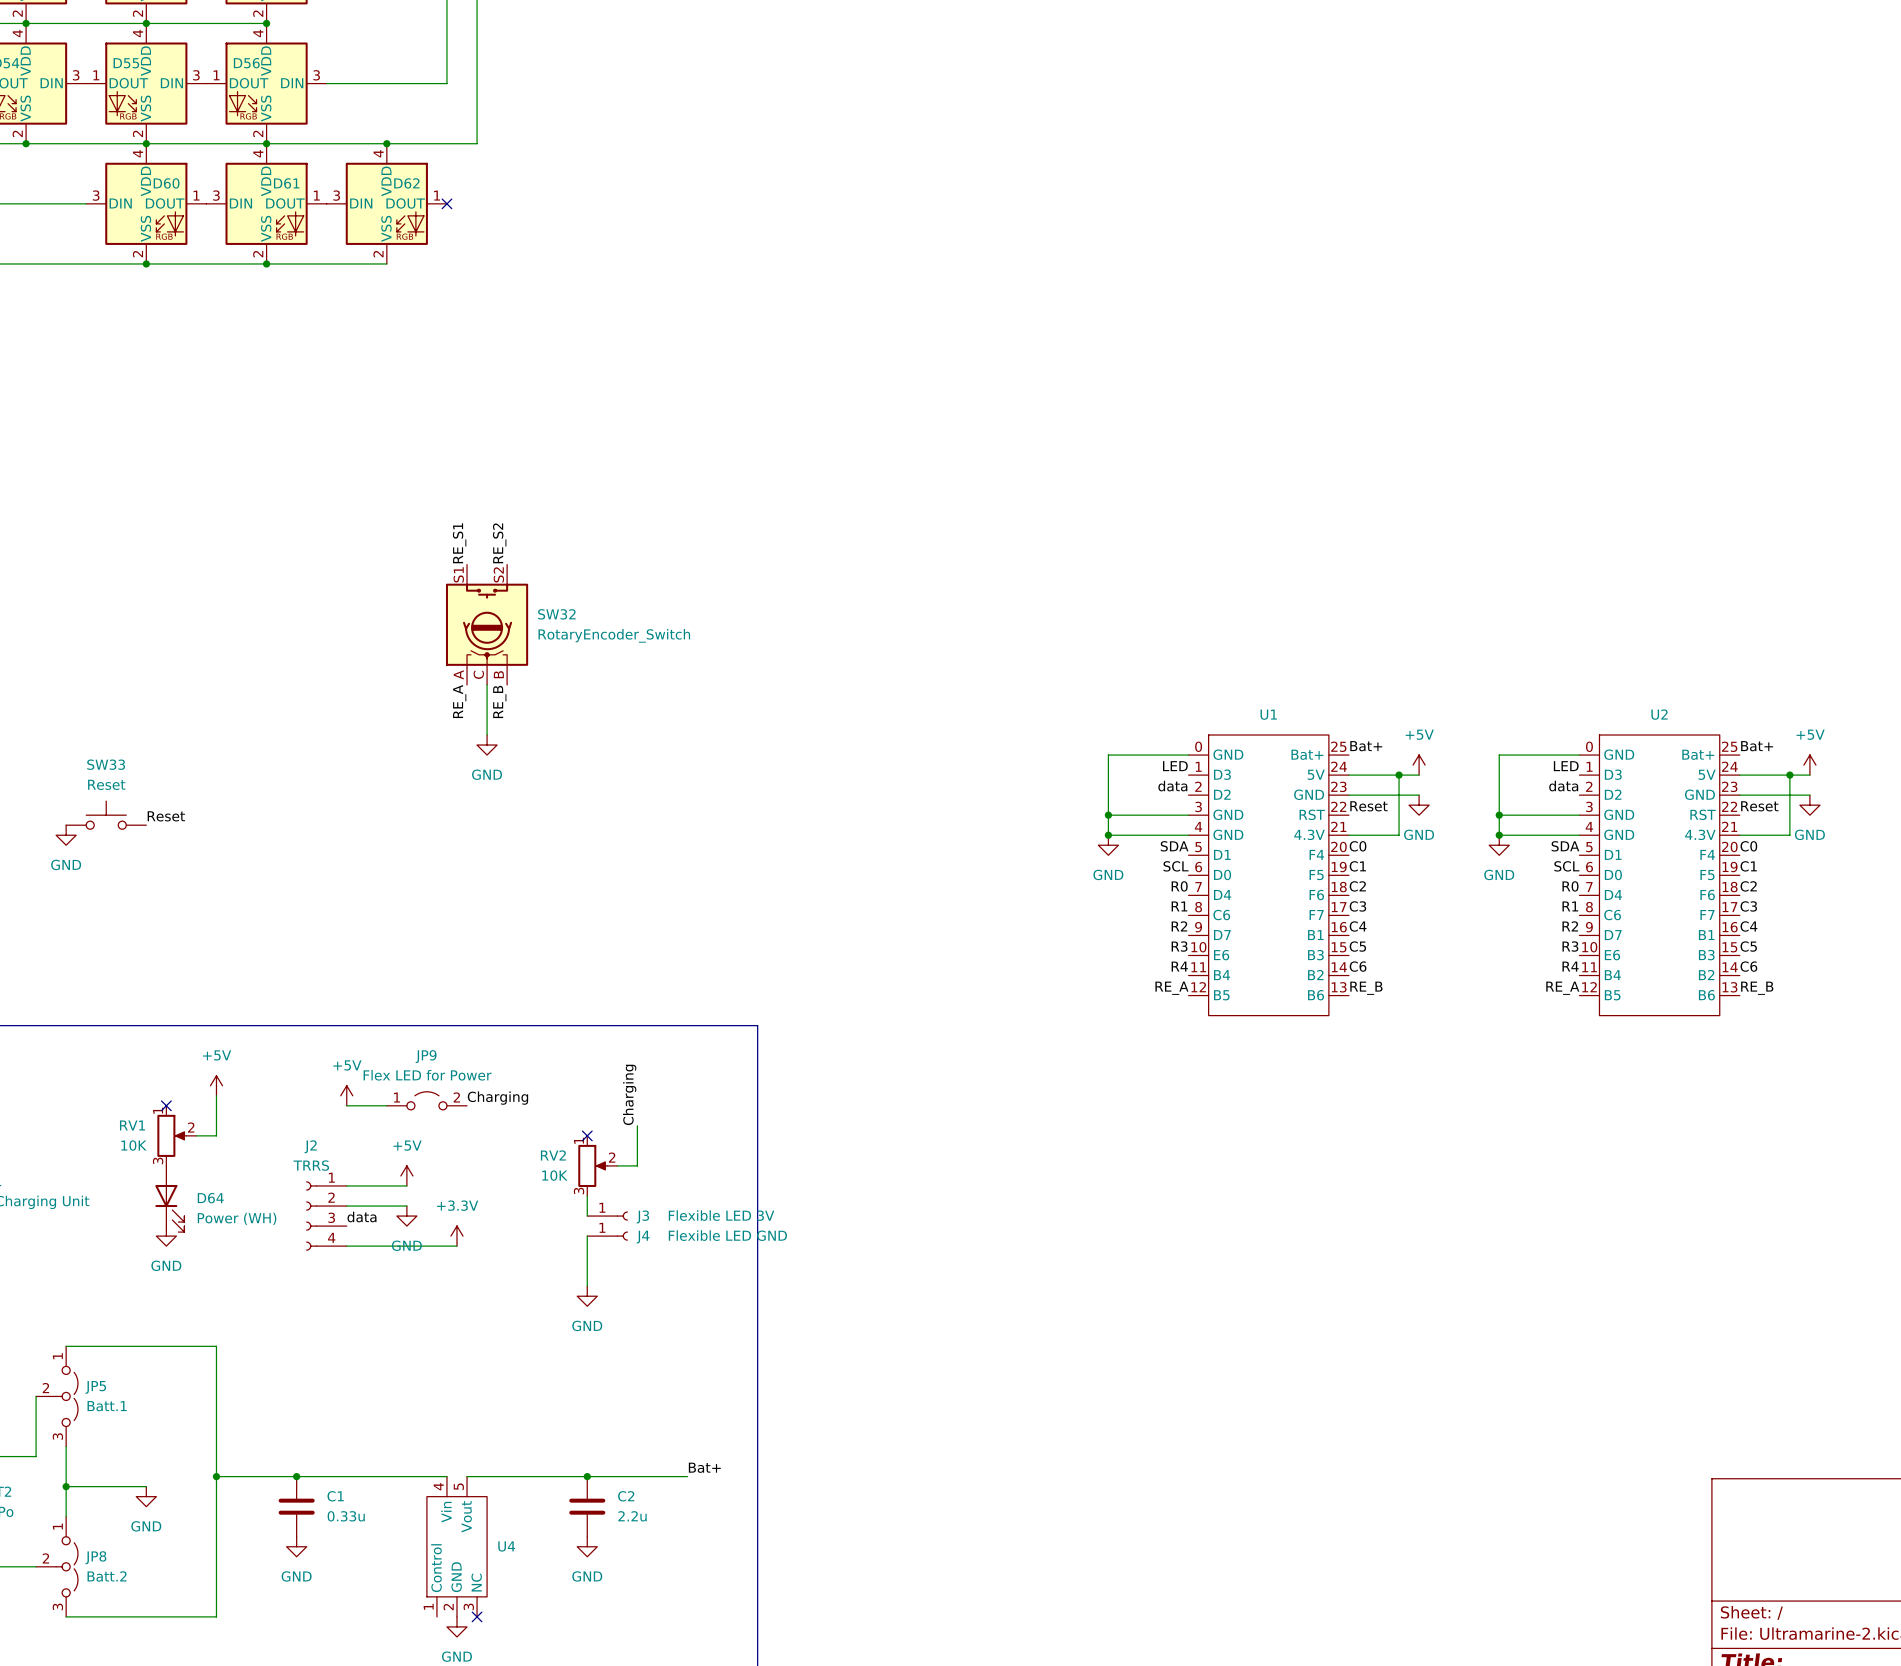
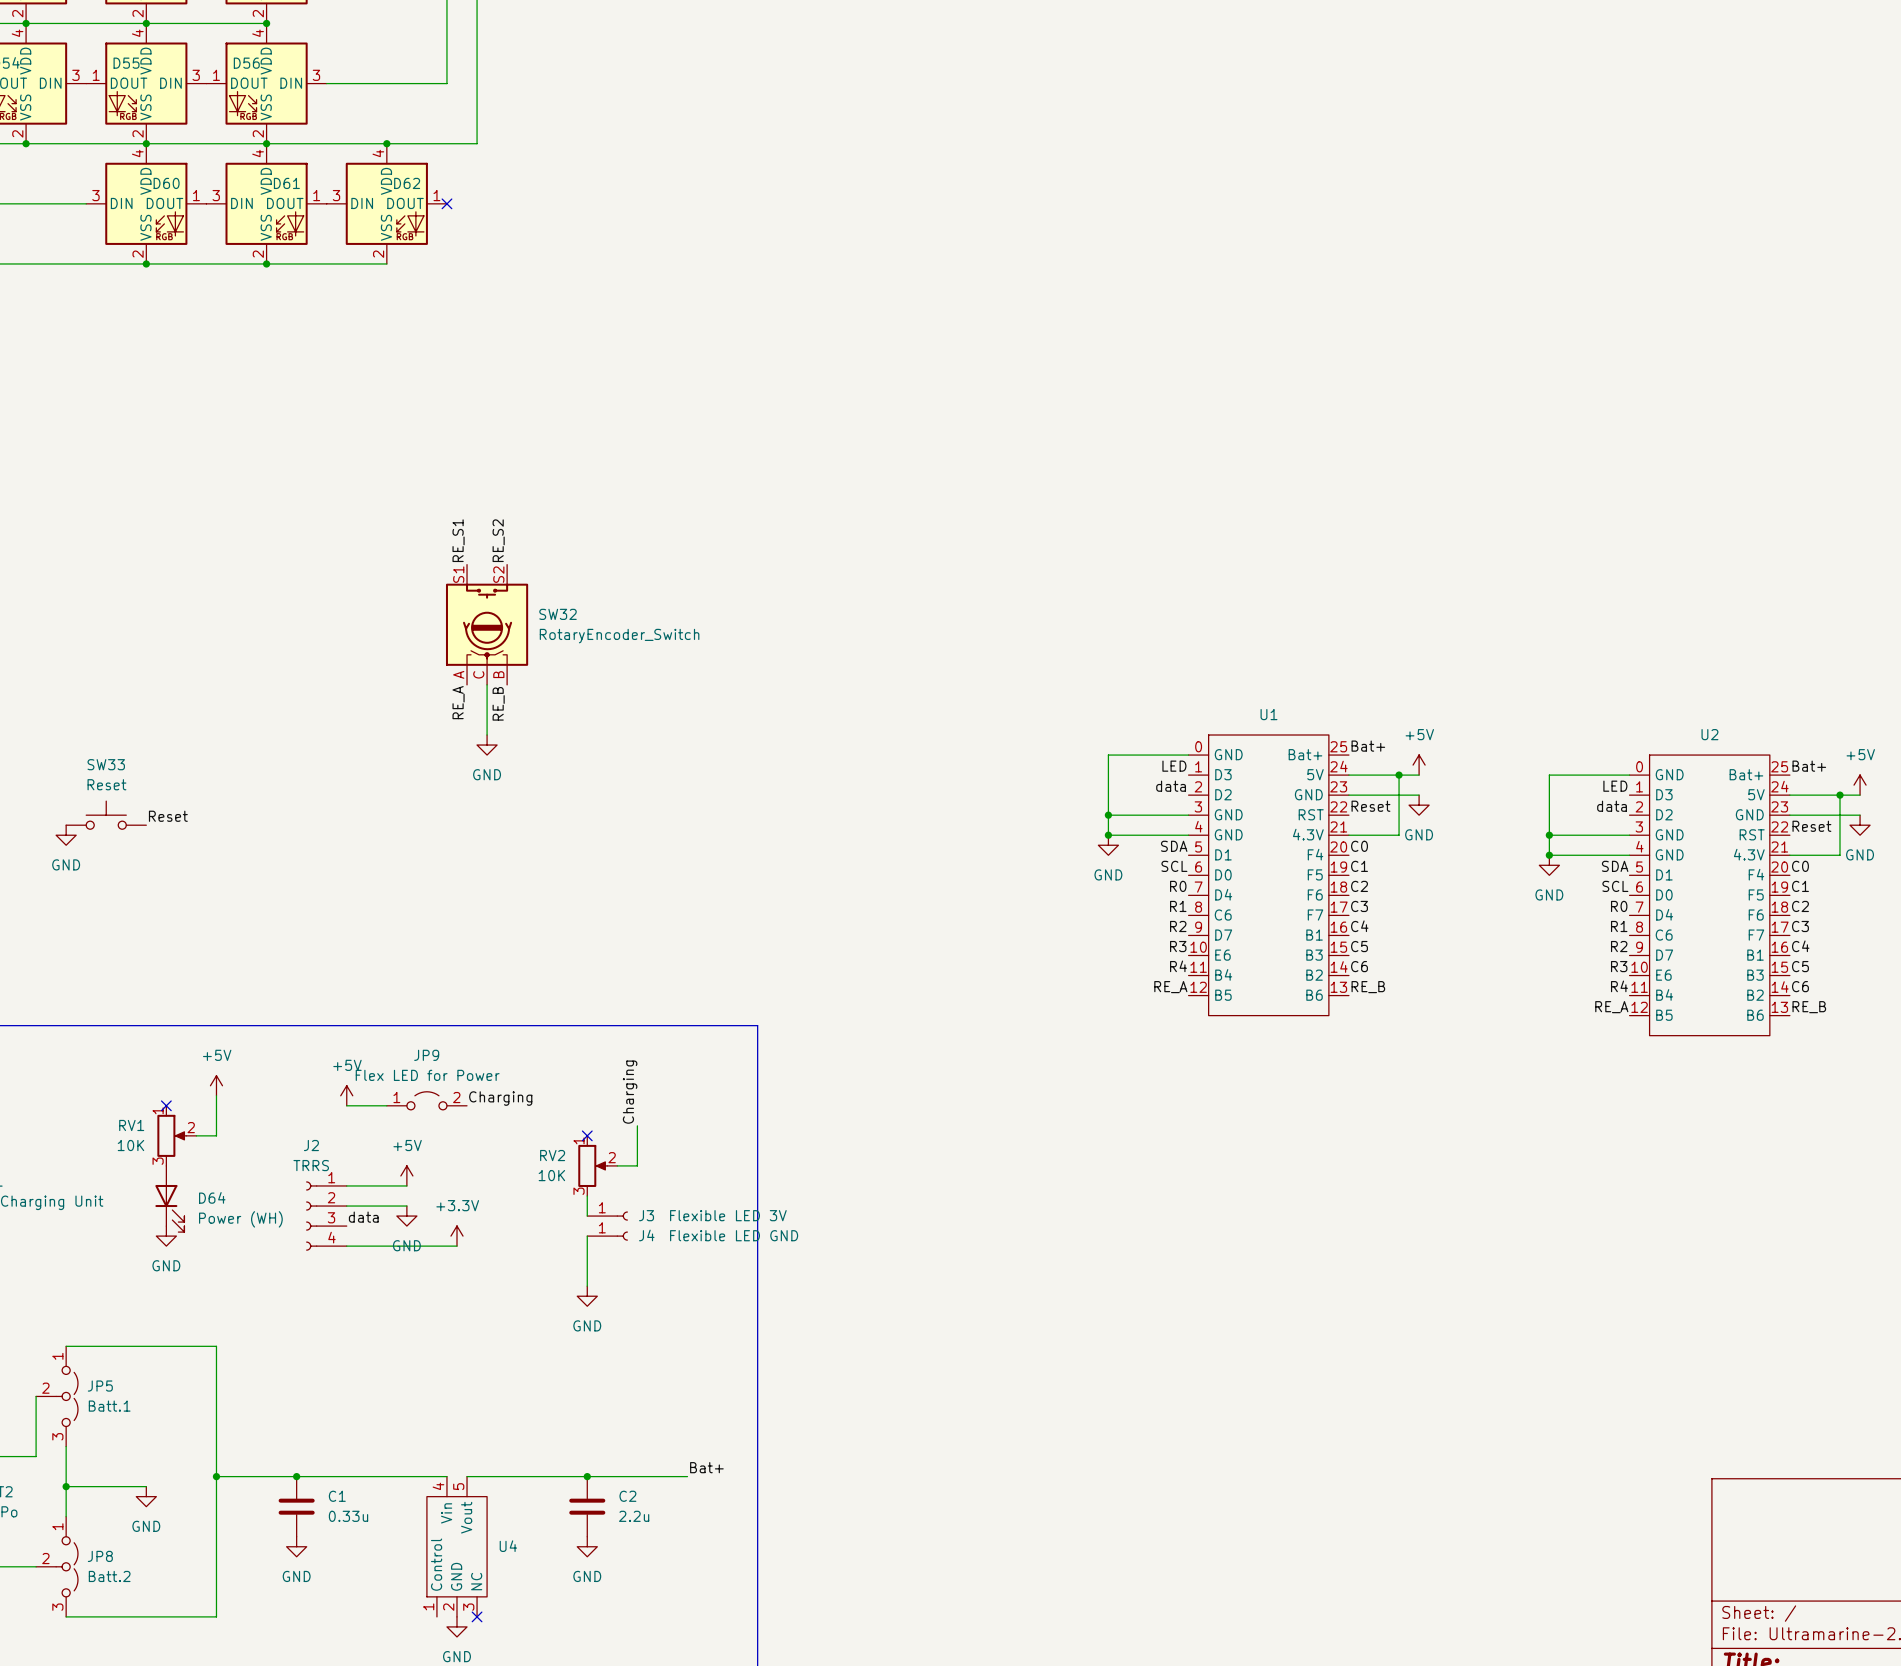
label position: Bat+ (1757, 746) -> Bat+ (1809, 766)
wire: (1579, 755) (1499, 755) (1499, 835) (1549, 835) -> none
power symbol position: +5V (1809, 765) -> +5V (1860, 785)
label position: LED (1566, 766) -> LED (1615, 786)
wire: none -> (1629, 775) (1549, 775) (1549, 855) (1629, 855)
wire: (1739, 775) (1809, 775) -> (1789, 815) (1860, 815)
wire: (1789, 775) (1789, 835) (1739, 835) -> (1840, 795) (1840, 855) (1789, 855)
junction: (1789, 775) -> none
label position: data (1563, 786) -> data (1612, 806)
wire: (1739, 795) (1789, 795) -> (1809, 795) (1860, 795)
junction: none -> (1840, 795)
power symbol position: GND (1809, 805) -> GND (1860, 825)
label position: Reset (1759, 806) -> Reset (1811, 826)
wire: (1499, 815) (1579, 815) -> none
junction: (1499, 815) -> none
junction: (1499, 835) -> none
junction: none -> (1549, 835)
power symbol position: GND (1499, 845) -> GND (1549, 865)
label position: SDA (1565, 846) -> SDA (1615, 866)
label position: C0 (1748, 846) -> C0 (1800, 866)
junction: none -> (1549, 855)
label position: SCL (1566, 866) -> SCL (1615, 886)
label position: C1 (1748, 866) -> C1 (1800, 886)
U2 position: (1659, 875) -> (1709, 895)
label position: R0 (1570, 886) -> R0 (1619, 906)
label position: C2 (1748, 886) -> C2 (1800, 906)
label position: R1 (1570, 906) -> R1 (1619, 926)
label position: C3 (1748, 906) -> C3 (1800, 926)
label position: R2 (1570, 926) -> R2 (1619, 946)
label position: C4 (1748, 926) -> C4 (1800, 946)
label position: R3 (1570, 946) -> R3 (1619, 966)
label position: C5 (1748, 946) -> C5 (1800, 966)
label position: R4 (1570, 966) -> R4 (1619, 986)
label position: C6 (1748, 966) -> C6 (1800, 986)
label position: RE_A (1562, 988) -> RE_A (1611, 1007)
label position: RE_B (1757, 988) -> RE_B (1809, 1007)

